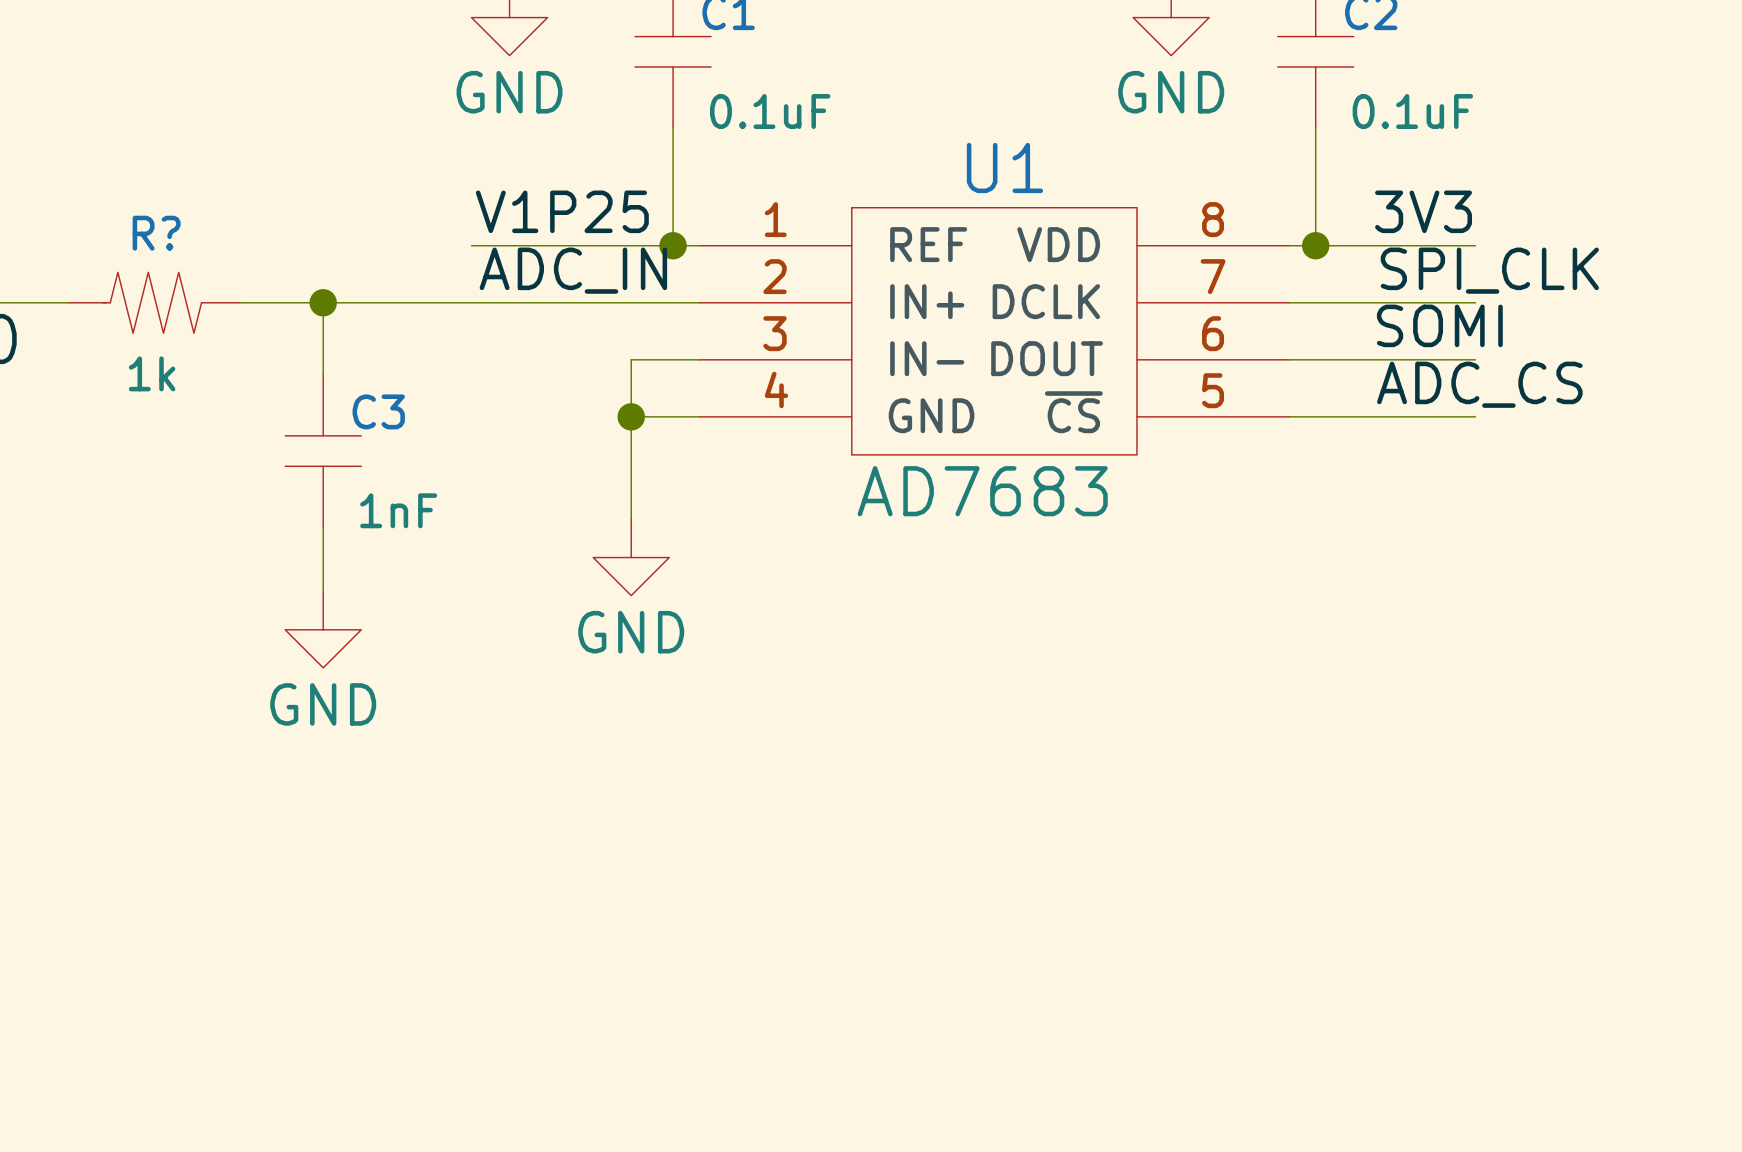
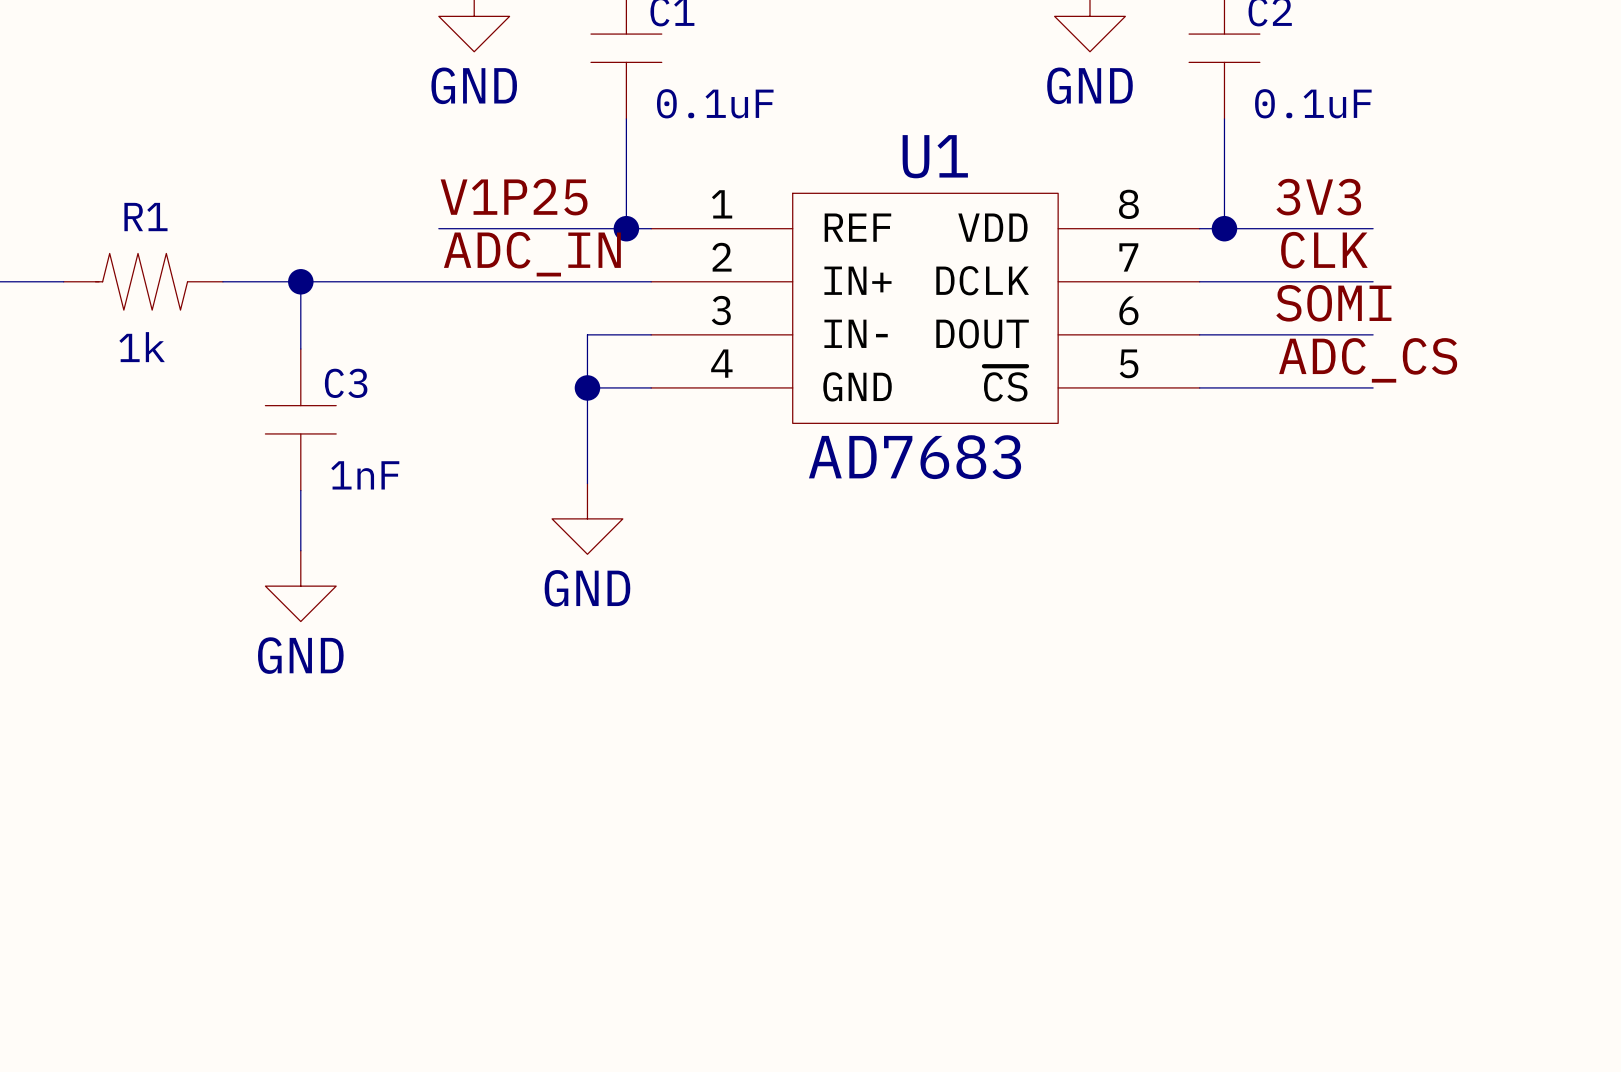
R? name: R? (156, 233) -> R1 (145, 217)
label: SPI_CLK (1489, 270) -> CLK (1324, 250)

